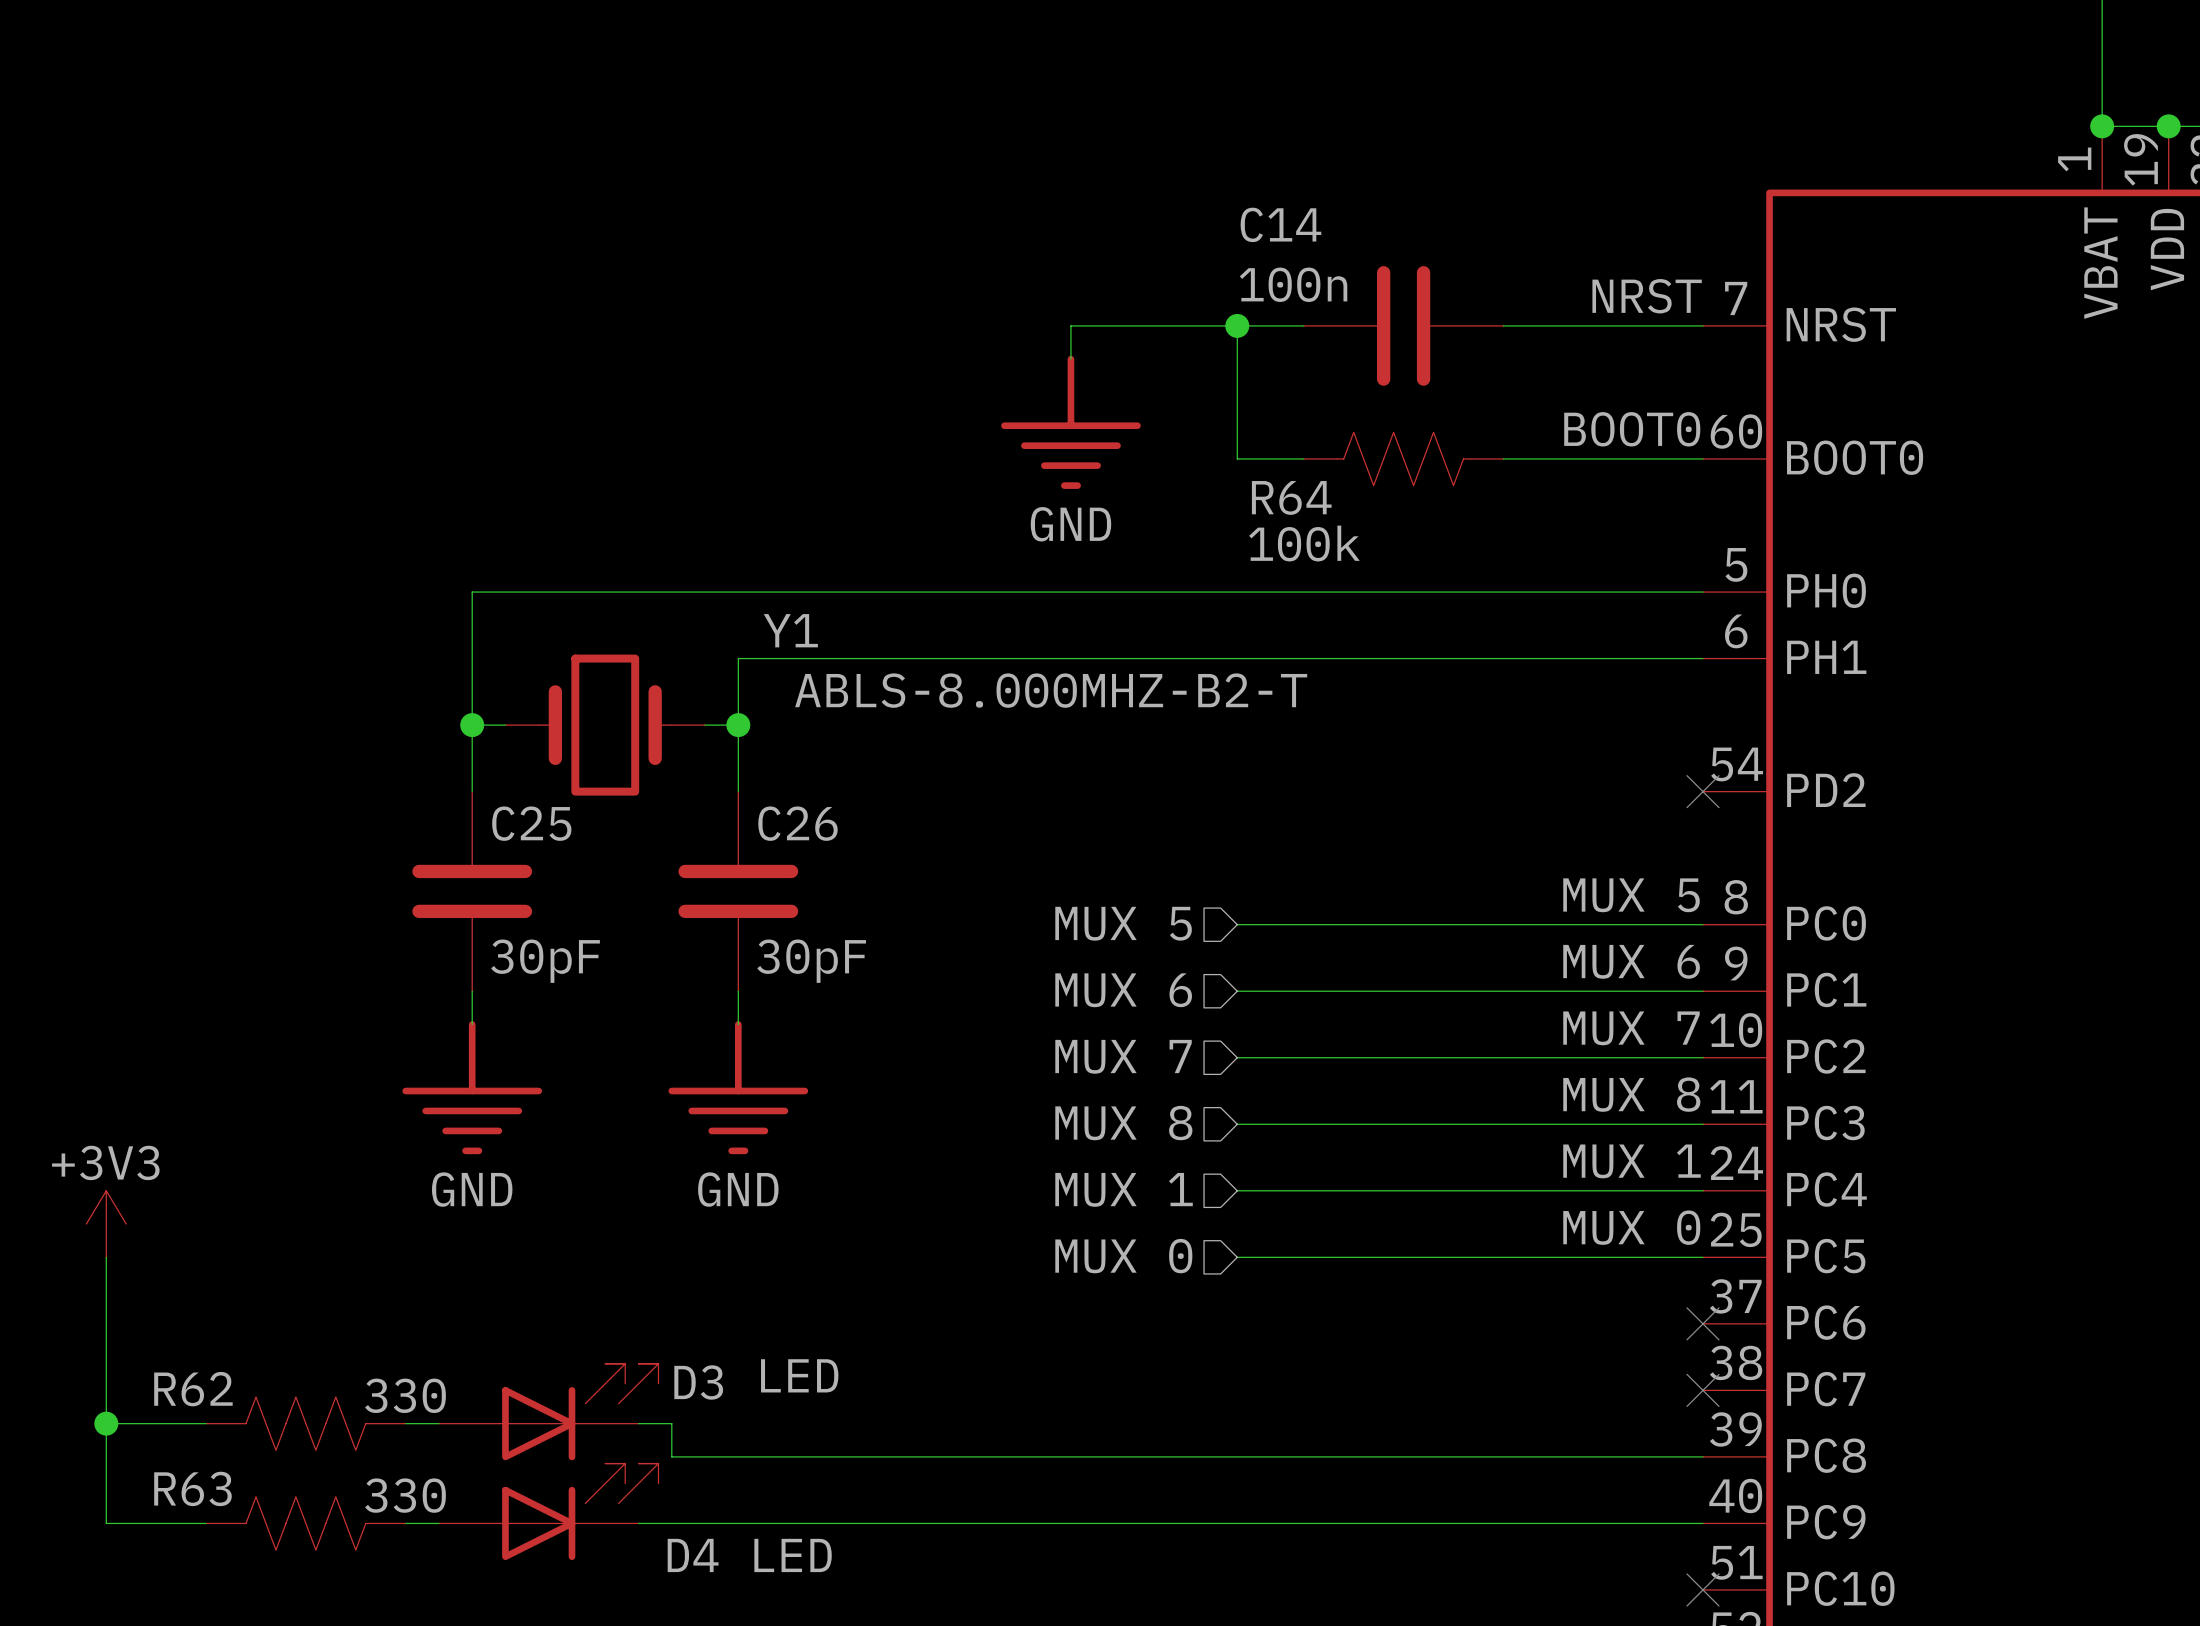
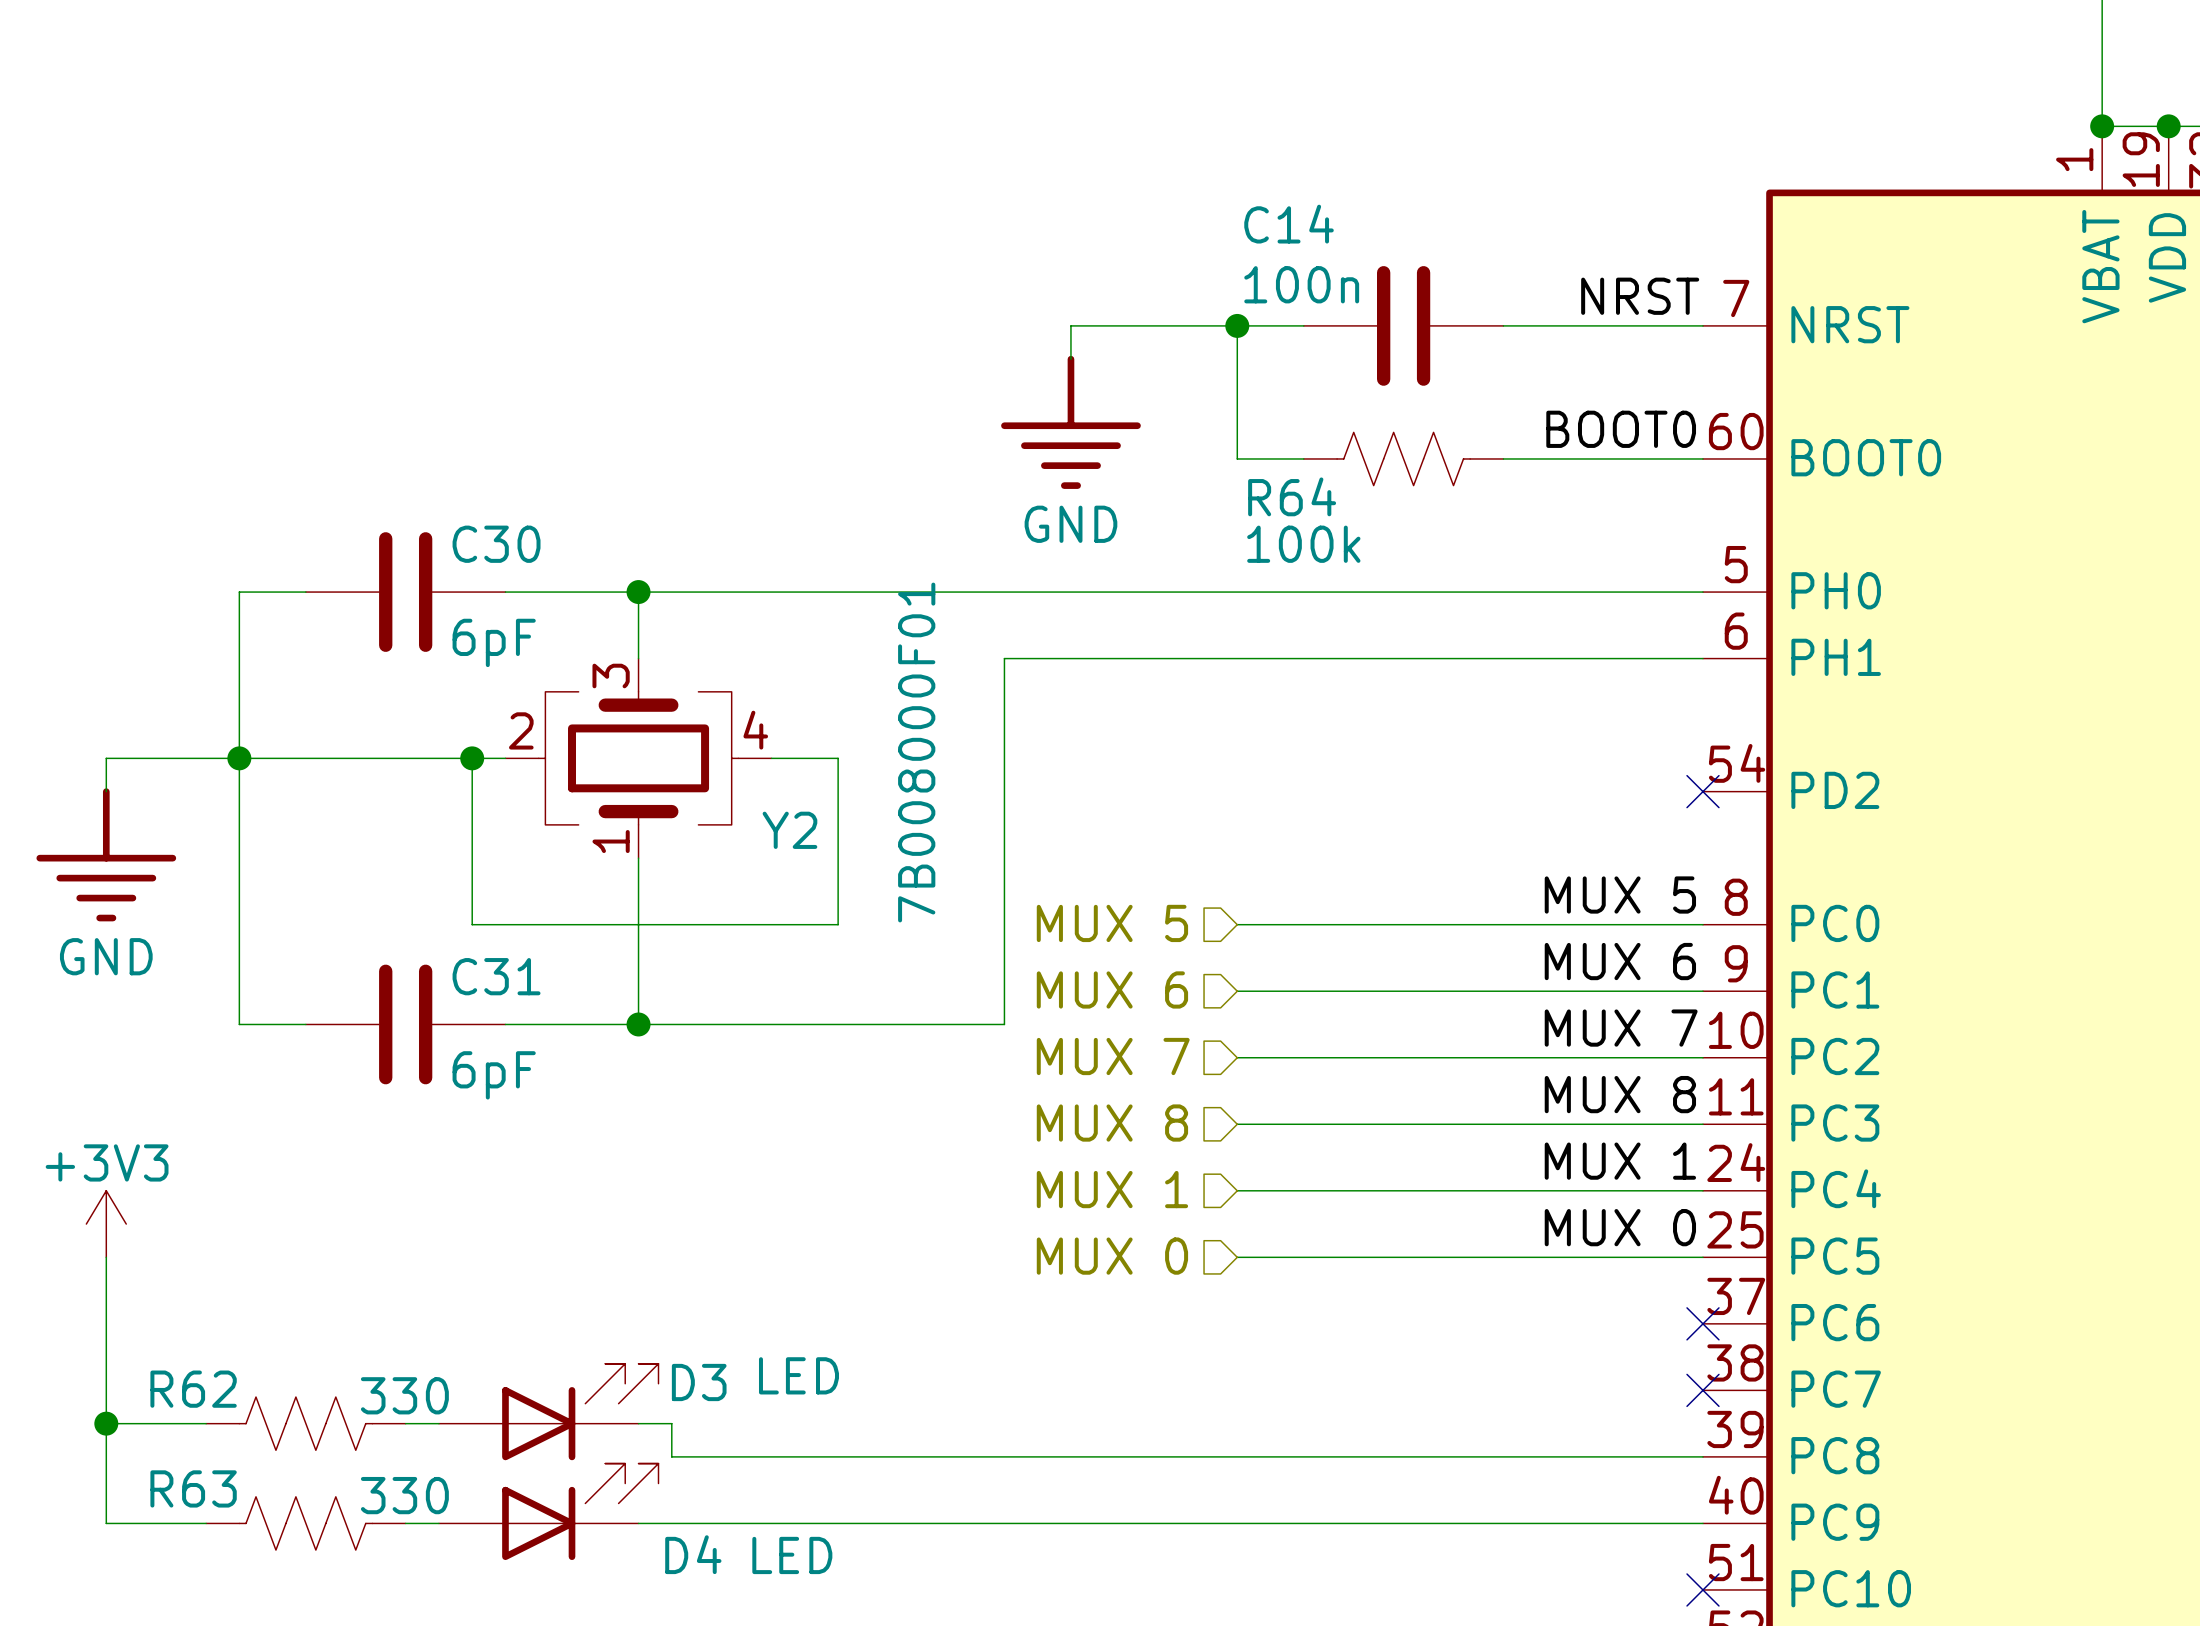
wire: none -> (305, 592) (239, 592) (239, 1024) (305, 1024)
C30: none -> 6pF (405, 592)
wire: (505, 592) (472, 592) (472, 758) -> none
wire: none -> (638, 592) (638, 658)
junction: none -> (638, 592)
wire: (1004, 658) (738, 658) (738, 791) -> (1004, 658) (1004, 1024) (505, 1024)
wire: (472, 725) (505, 725) -> none
junction position: (472, 725) -> (472, 758)
Y1: ABLS-8.000MHZ-B2-T (605, 725) -> none
wire: (705, 725) (738, 725) -> none
junction: (738, 725) -> none
junction: none -> (239, 758)
wire: none -> (505, 758) (106, 758) (106, 791)
Y2: none -> 7B008000F01 (638, 758)
wire: none -> (771, 758) (838, 758) (838, 924) (472, 924) (472, 791)
power symbol: none -> GND (106, 854)
wire: none -> (638, 858) (638, 1024)
C25: 30pF (472, 891) -> none
C26: 30pF (738, 891) -> none
wire: (472, 991) (472, 1024) -> none
wire: (738, 991) (738, 1024) -> none
C31: none -> 6pF (405, 1024)
junction: none -> (638, 1024)
power symbol: GND (472, 1087) -> none
power symbol: GND (738, 1087) -> none

